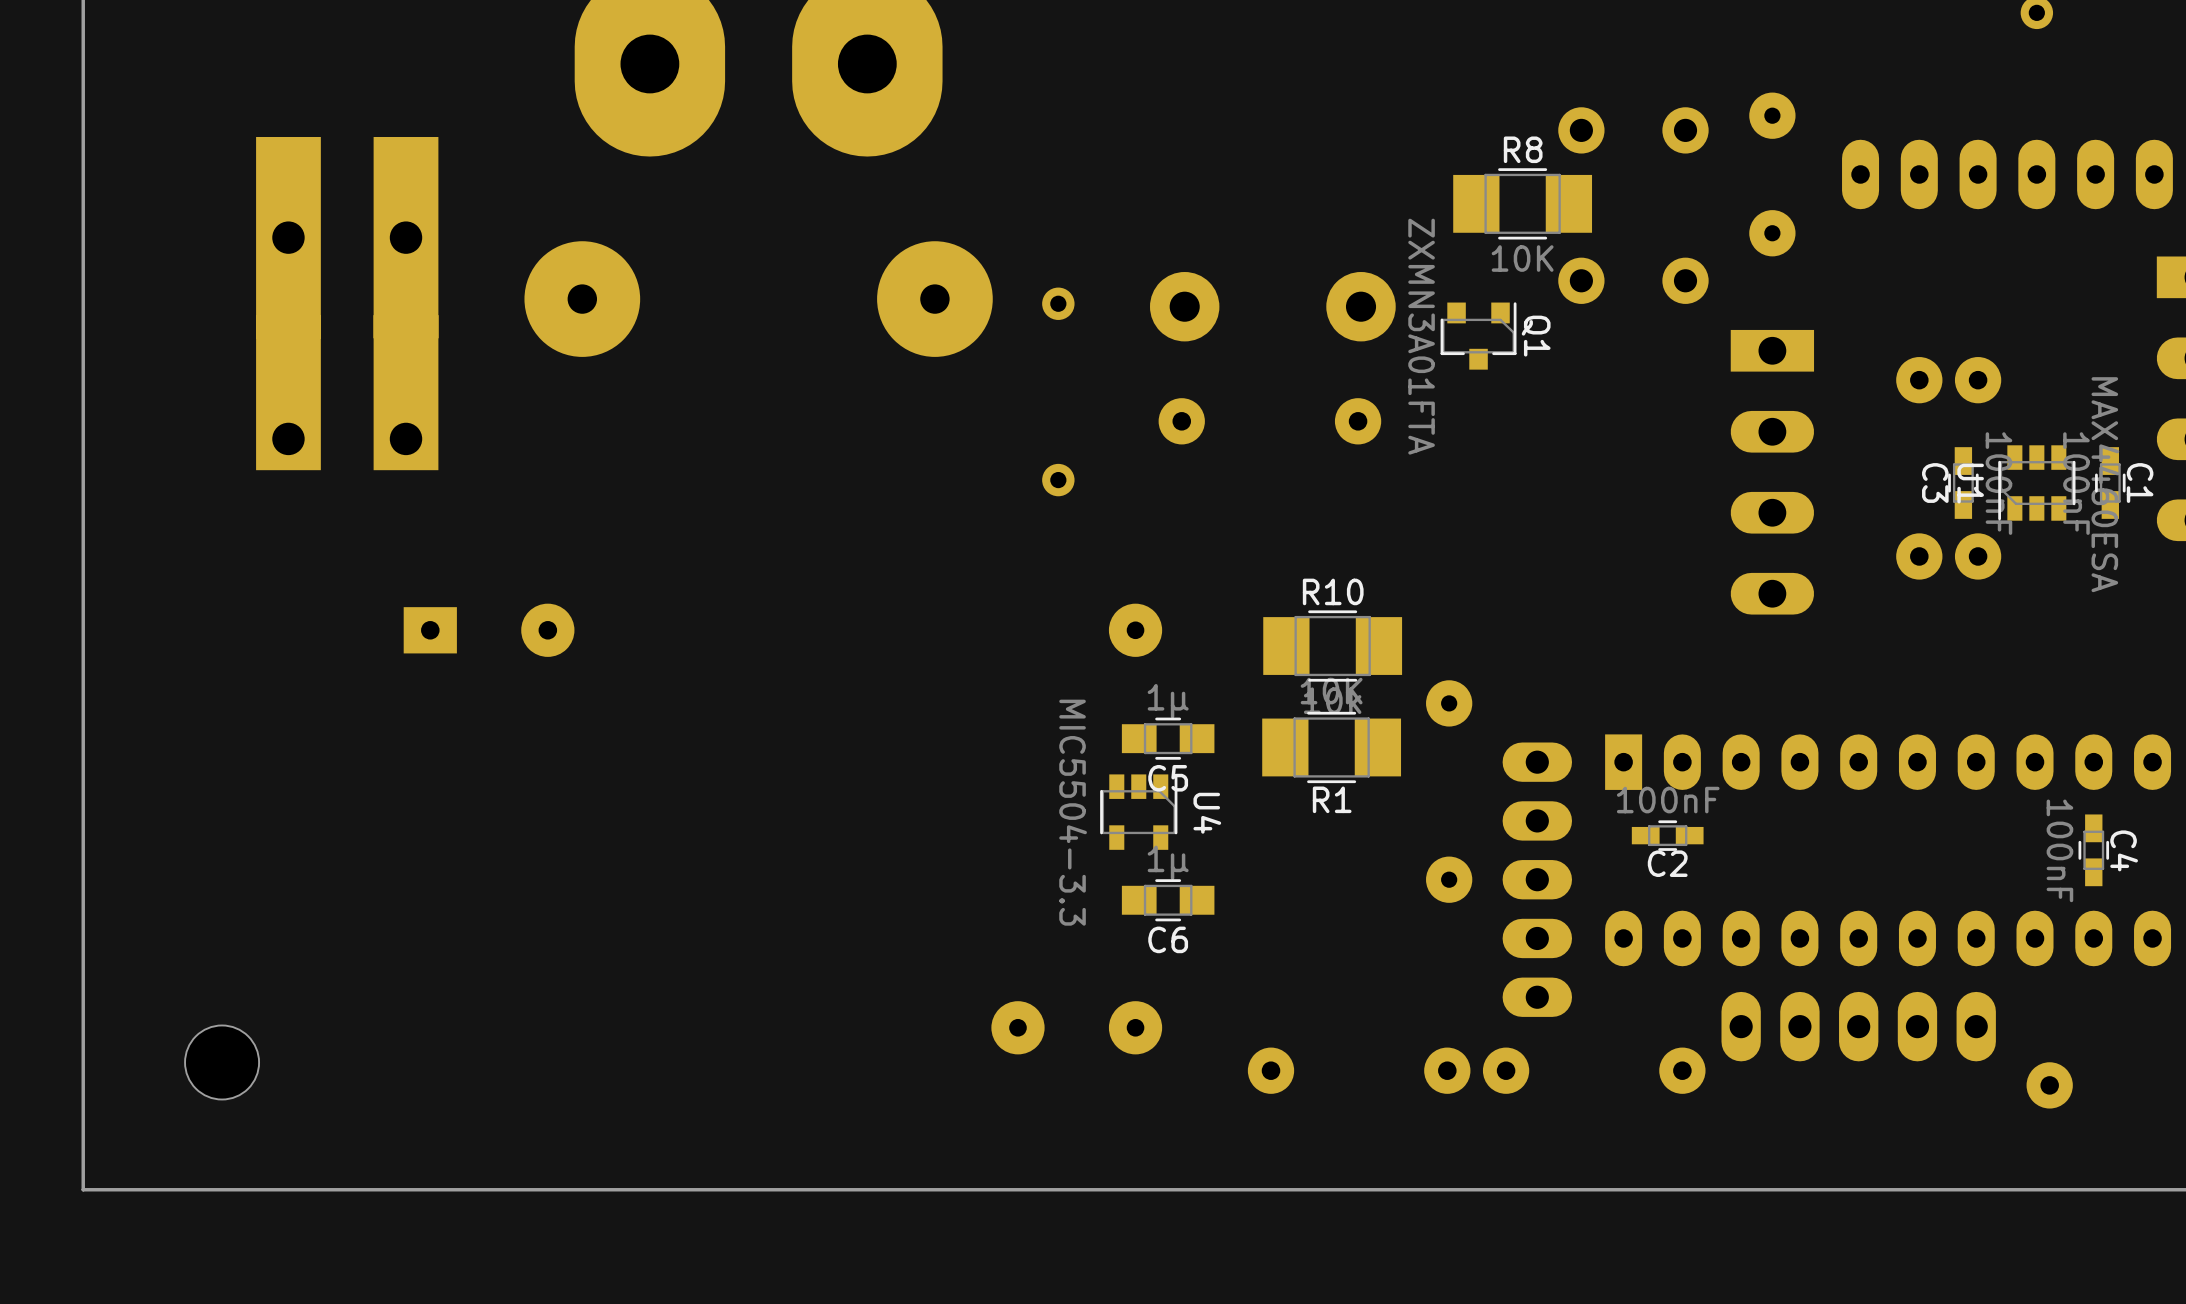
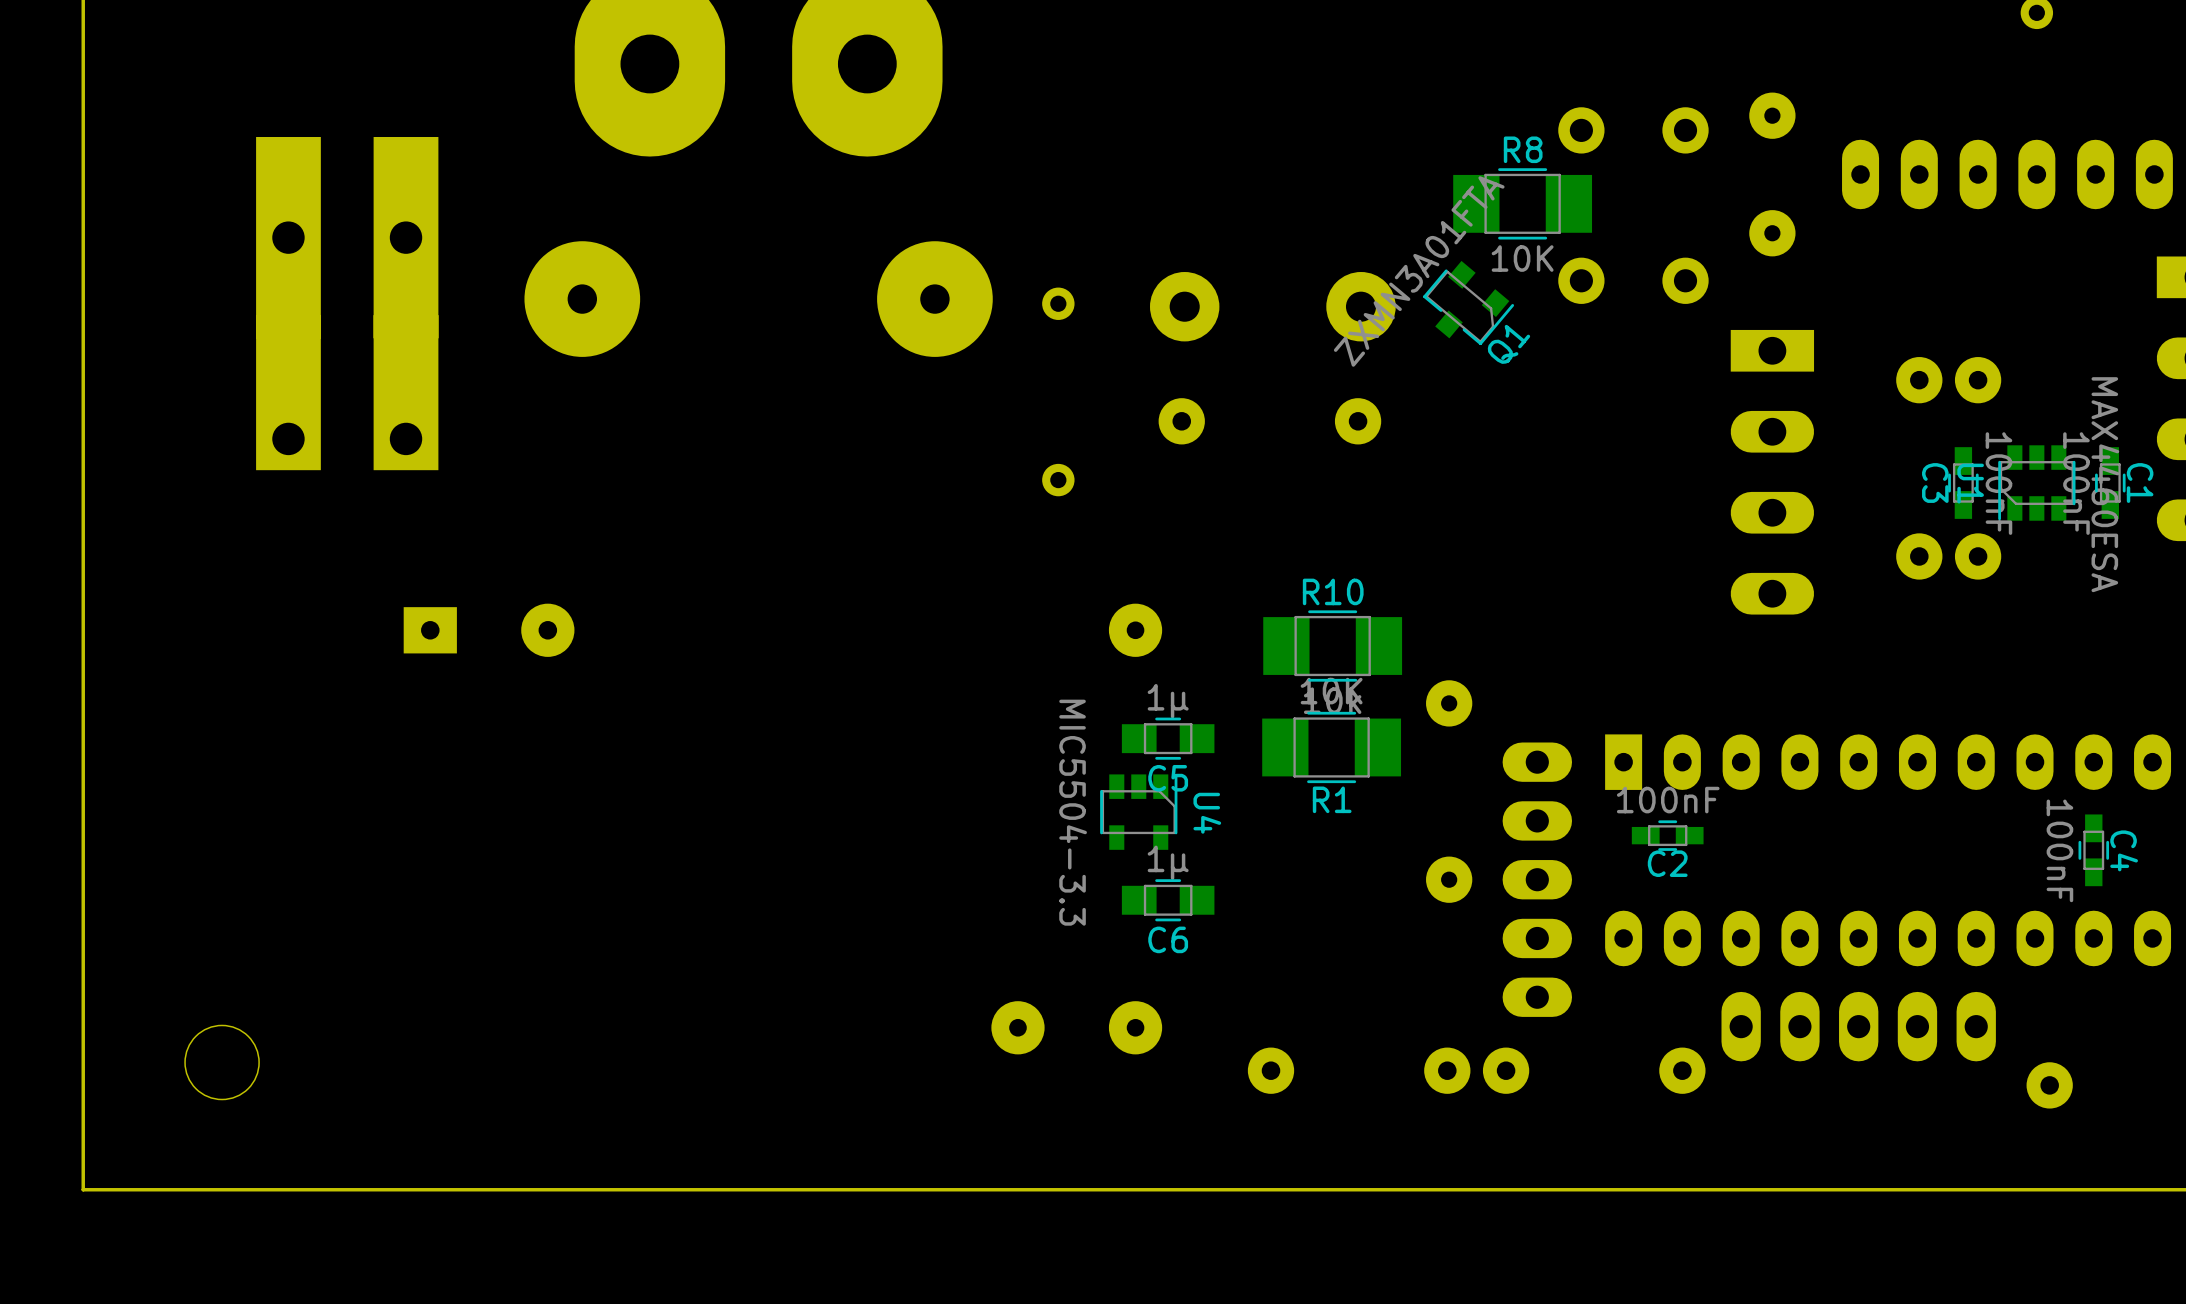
Q1 rotation: 0° (1478, 335) -> 40° clockwise (1468, 302)

